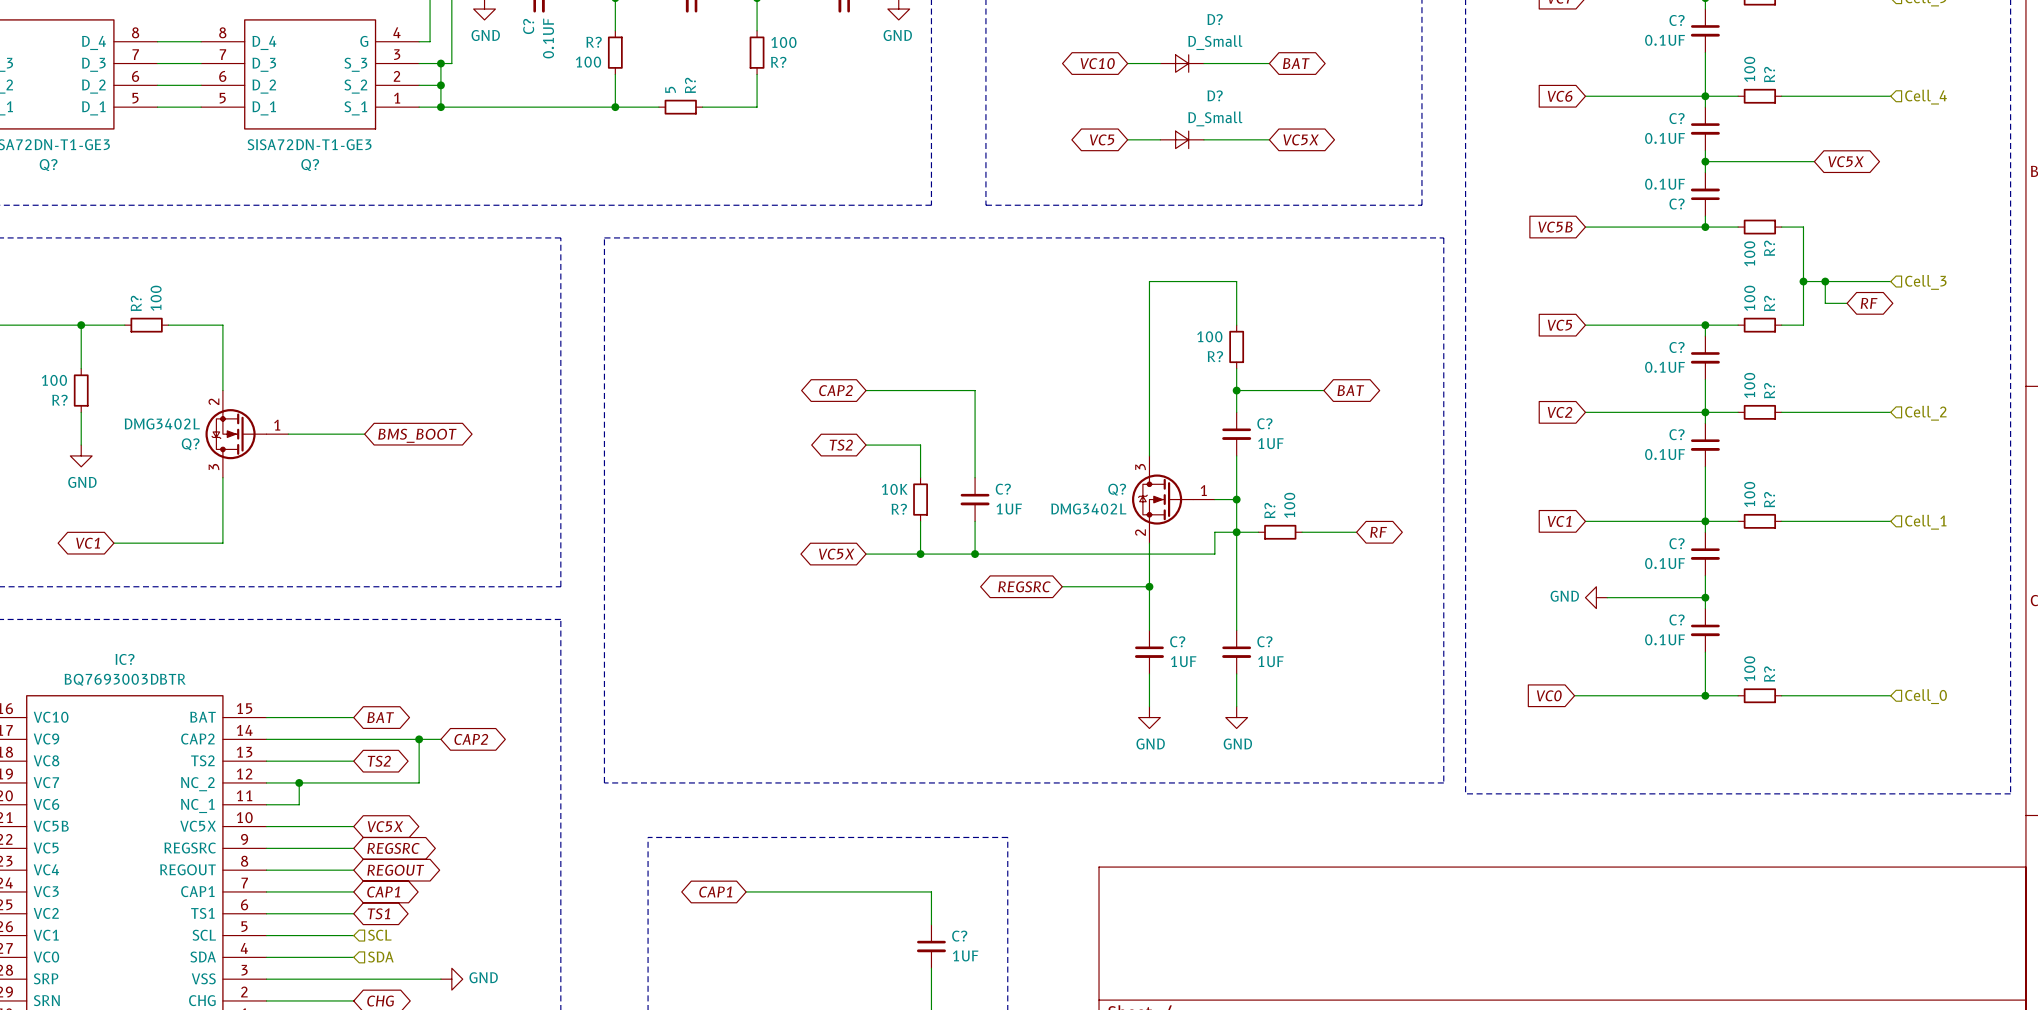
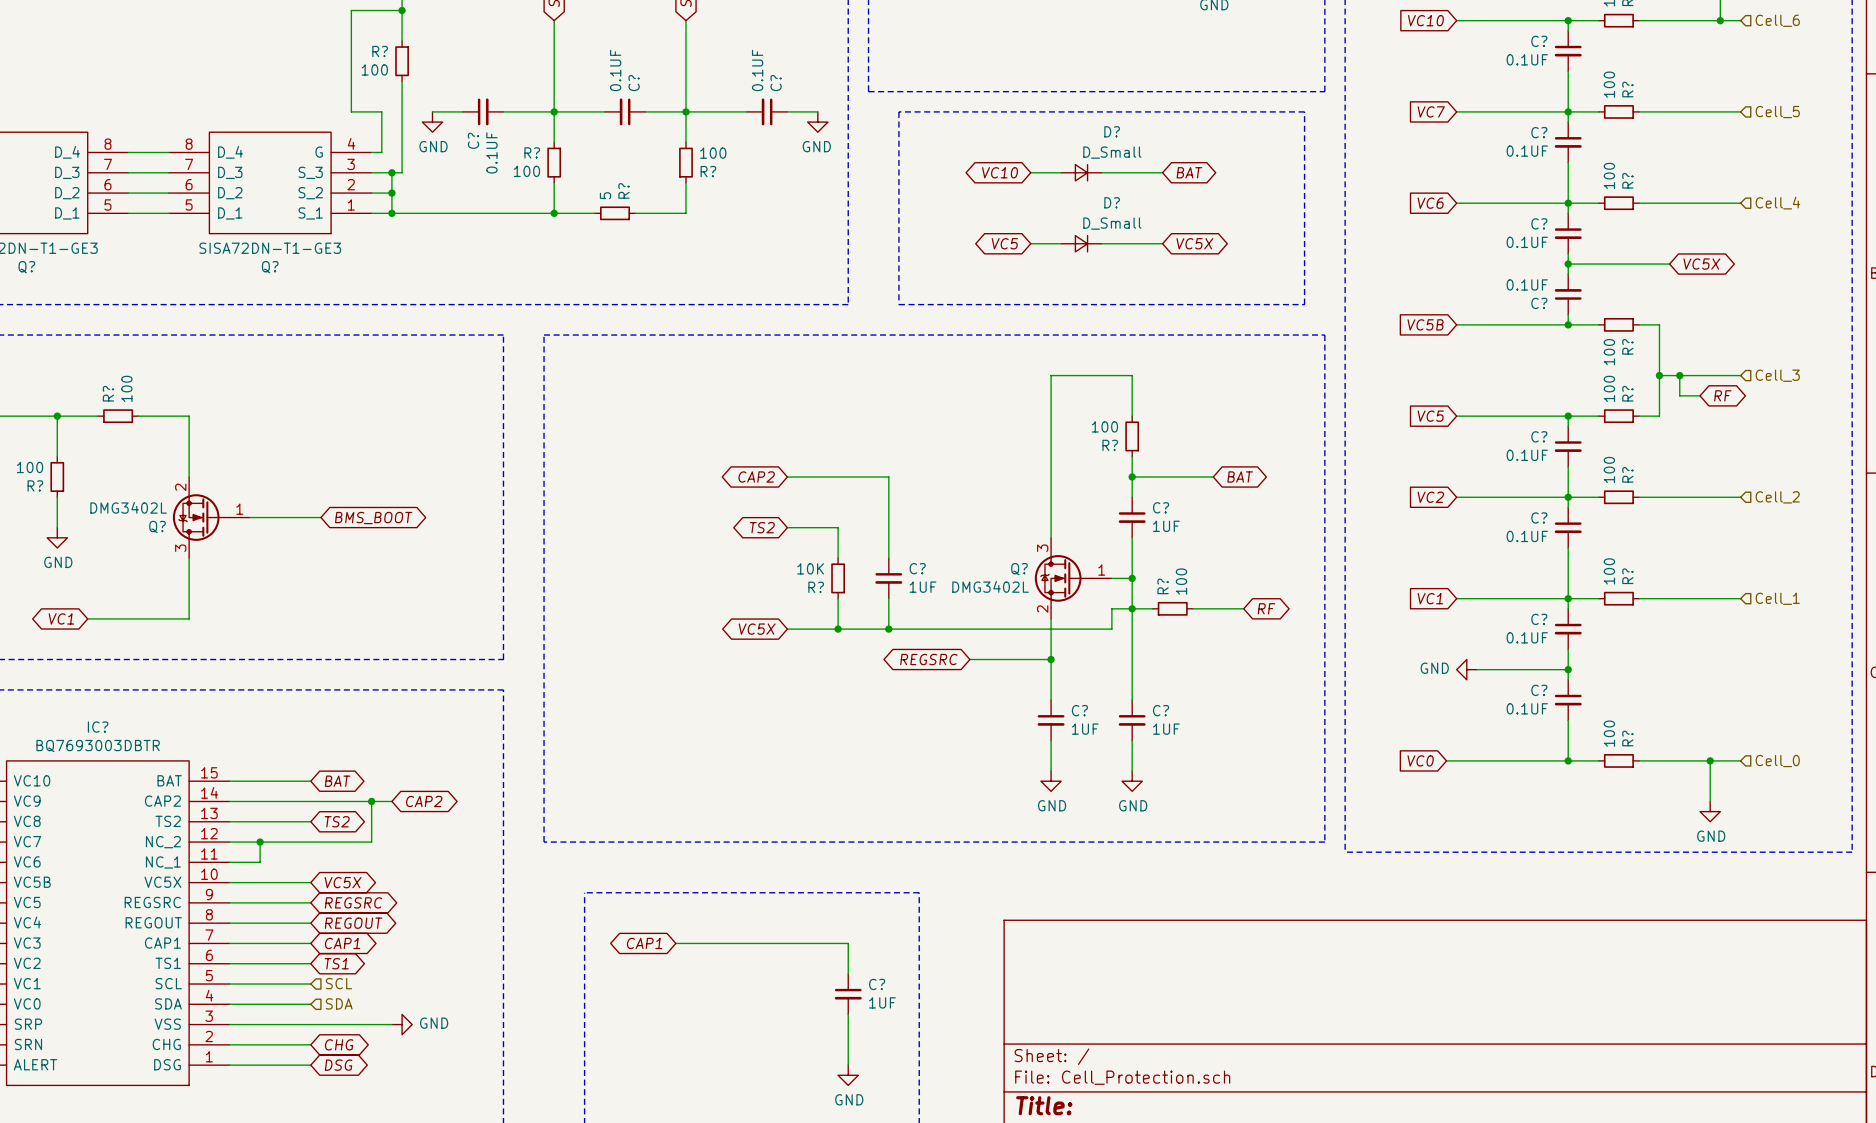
wire: none -> (1710, 760) (1710, 801)
junction: none -> (1710, 760)
power symbol: none -> GND (1710, 811)

